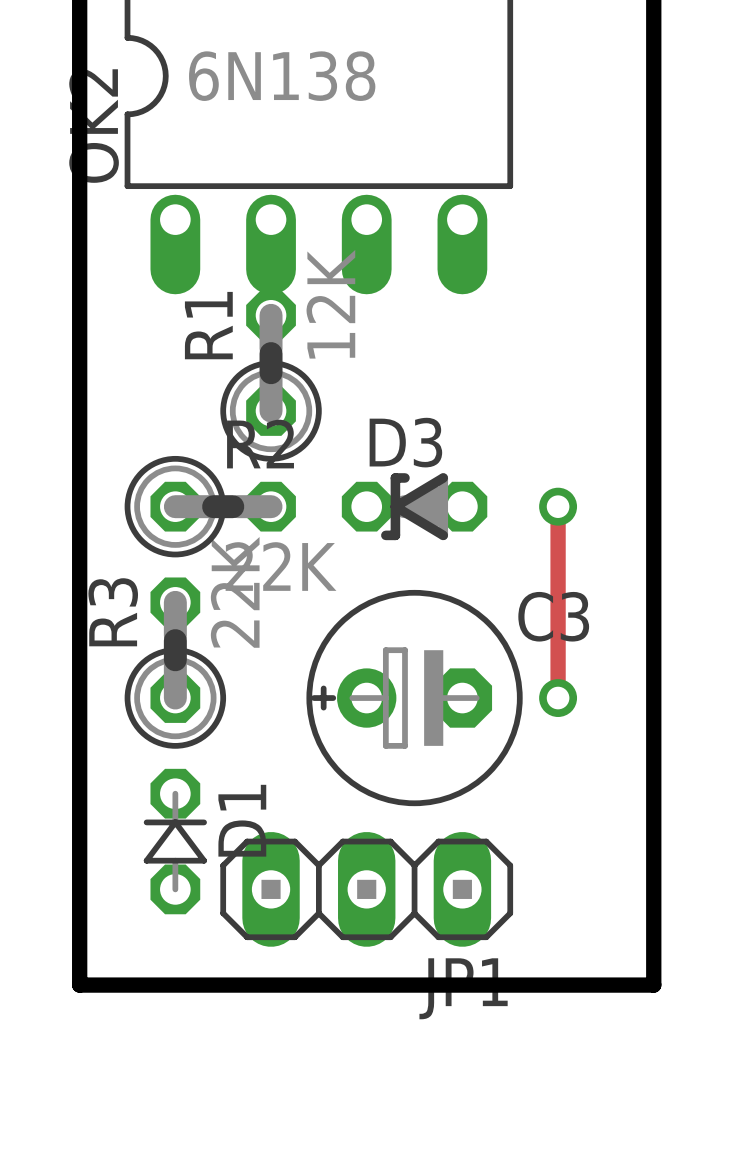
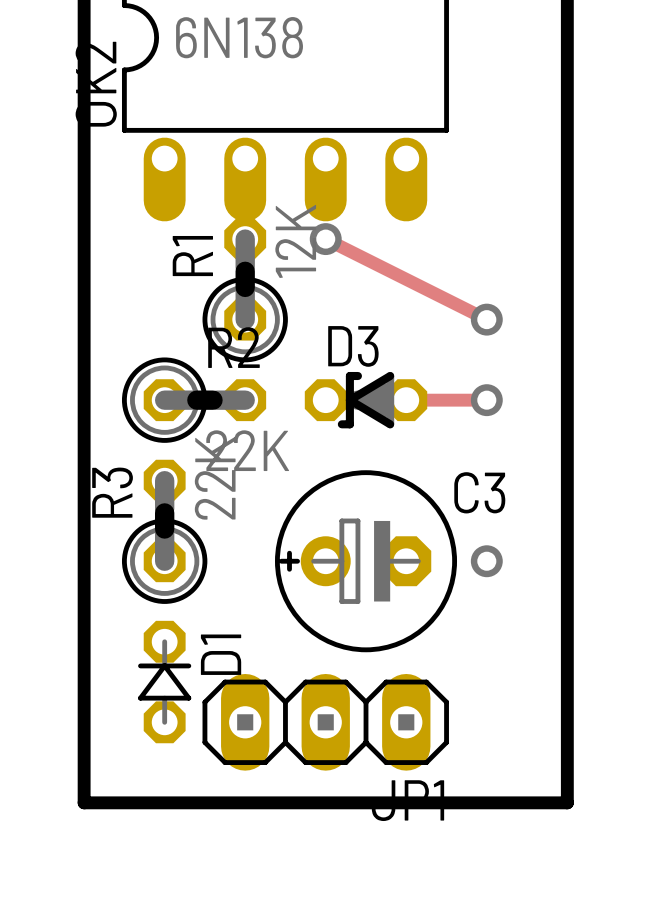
track: none -> (325, 239) (486, 319)
via: none -> (325, 239)
via: none -> (486, 319)
track: (558, 506) (558, 698) -> (486, 400) (406, 400)

